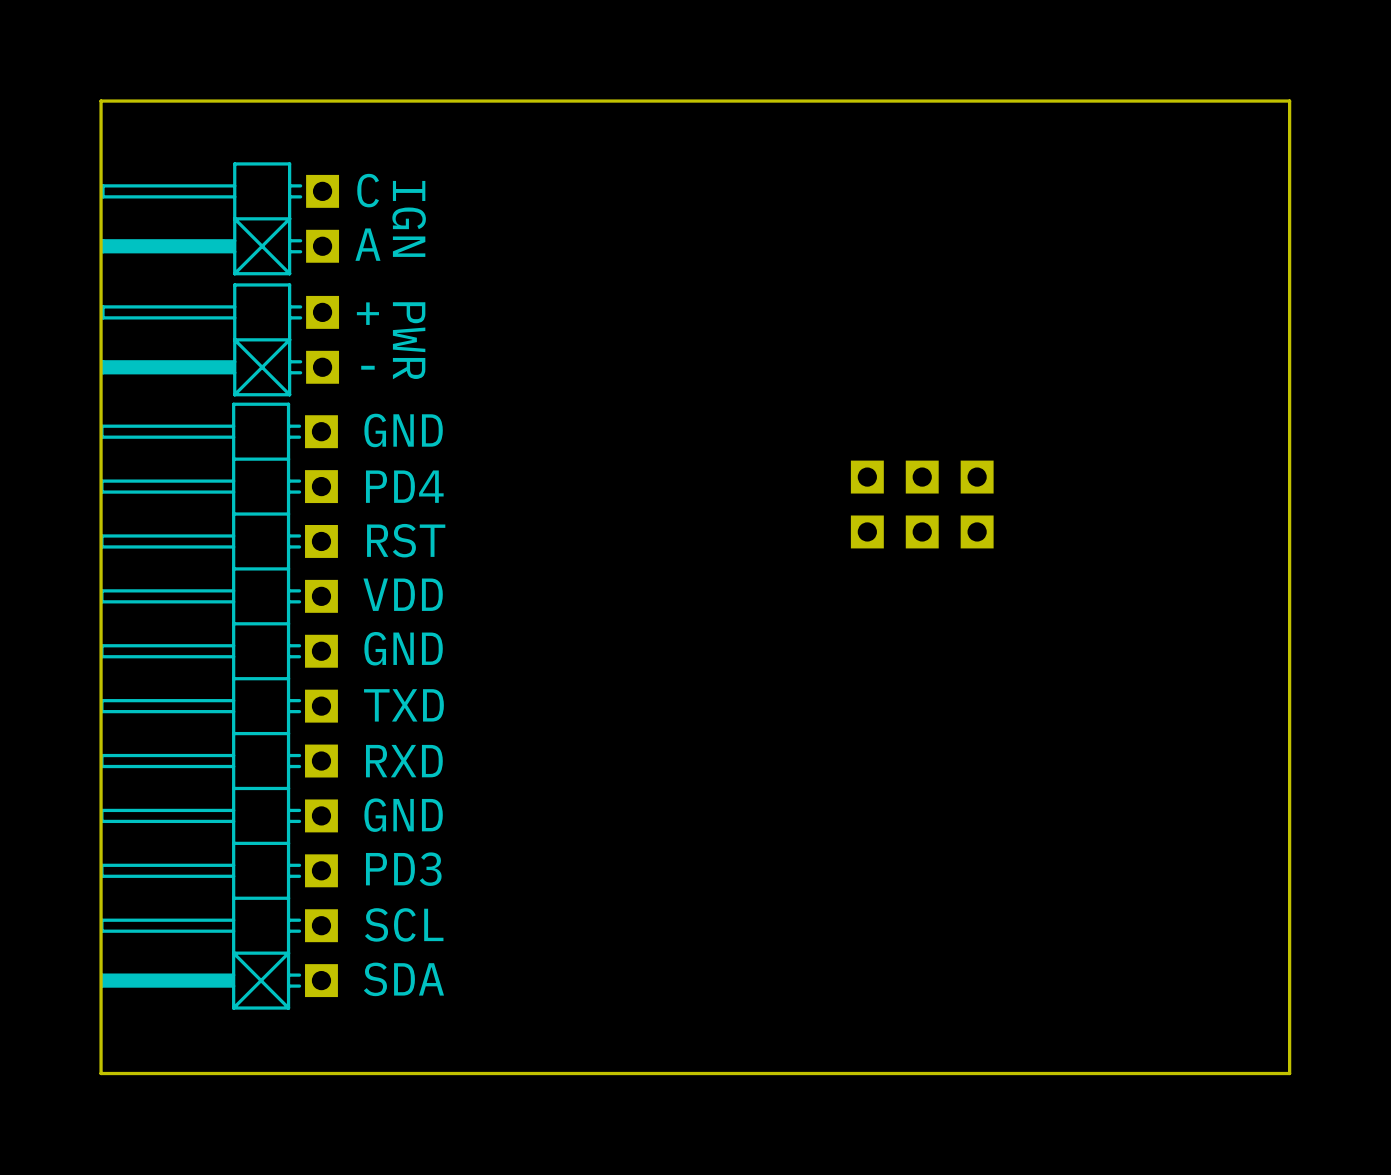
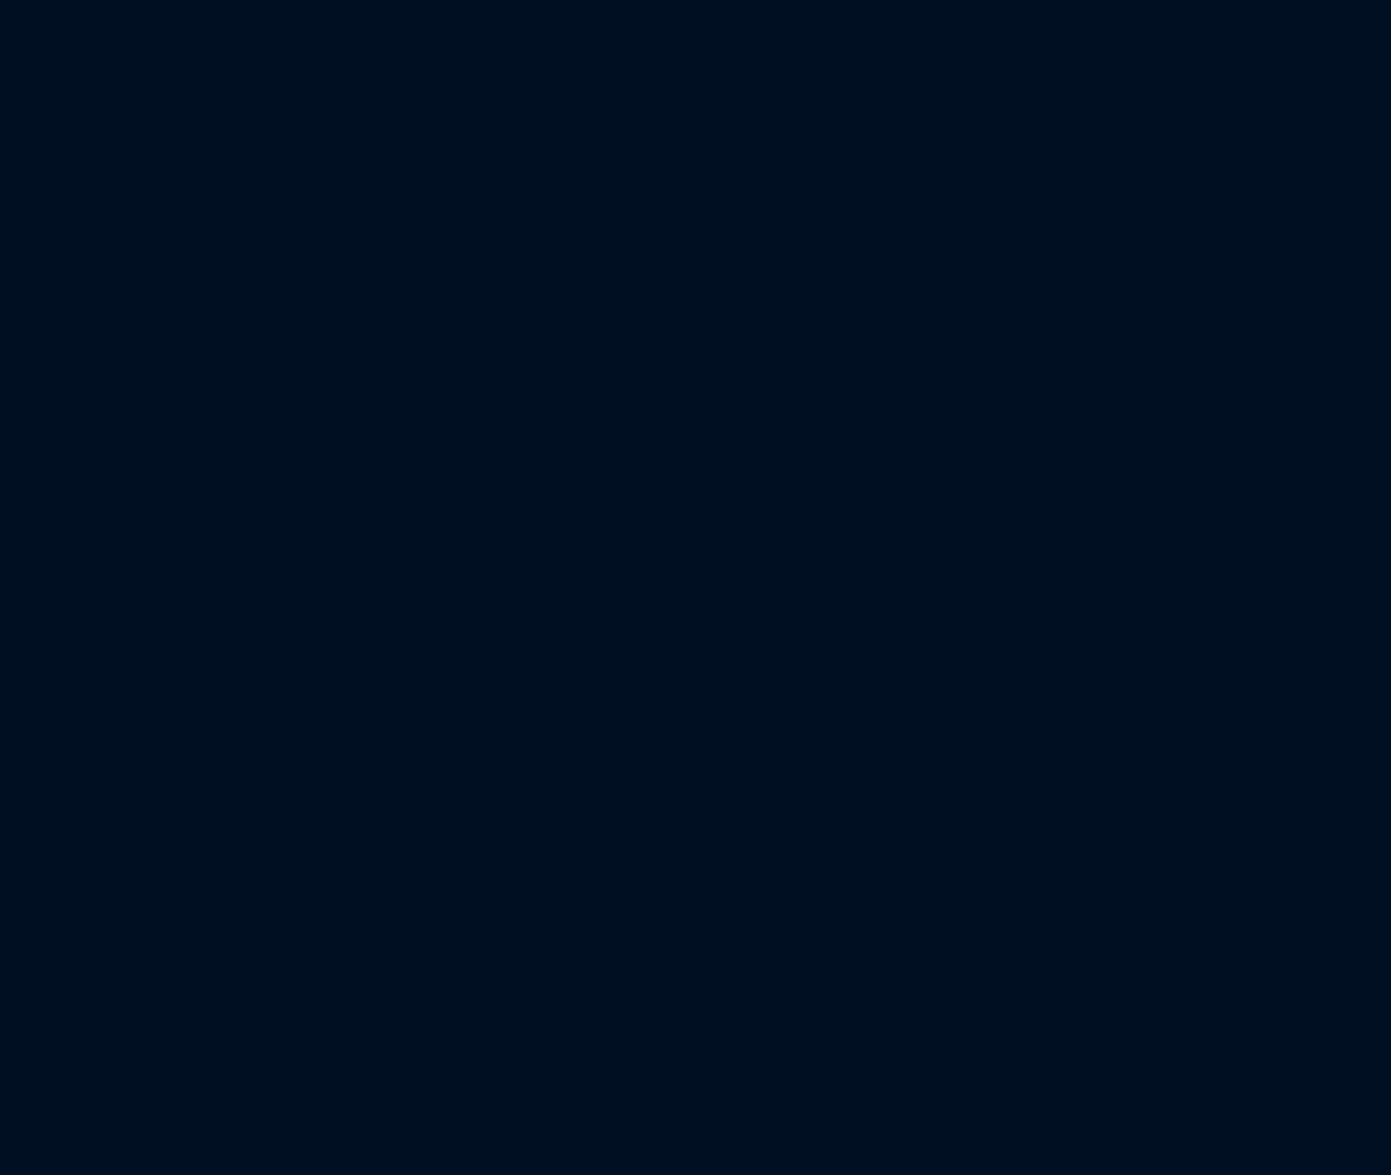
board edge: (1289, 101) (1289, 1073) (101, 1073) (101, 101) (1289, 101) -> none
text: C (368, 190) -> none
part: IGN (220, 218) -> none
text: A (367, 244) -> none
text: + (367, 313) -> none
part: PWR (220, 339) -> none
text: - (367, 367) -> none
text: GND (403, 430) -> none
text: PD4 (404, 486) -> none
part: (922, 504) -> none
text: RST (406, 540) -> none
text: VDD (403, 594) -> none
text: GND (403, 648) -> none
text: TXD (403, 705) -> none
part: (219, 706) -> none
text: RXD (404, 761) -> none
text: GND (403, 815) -> none
text: PD3 (403, 869) -> none
text: SCL (404, 924) -> none
text: SDA (403, 979) -> none

